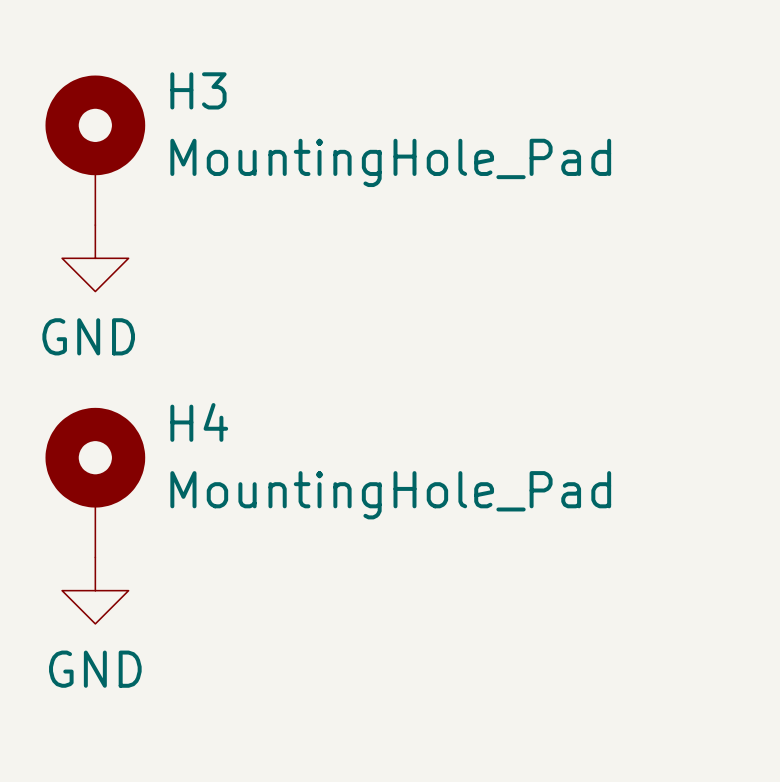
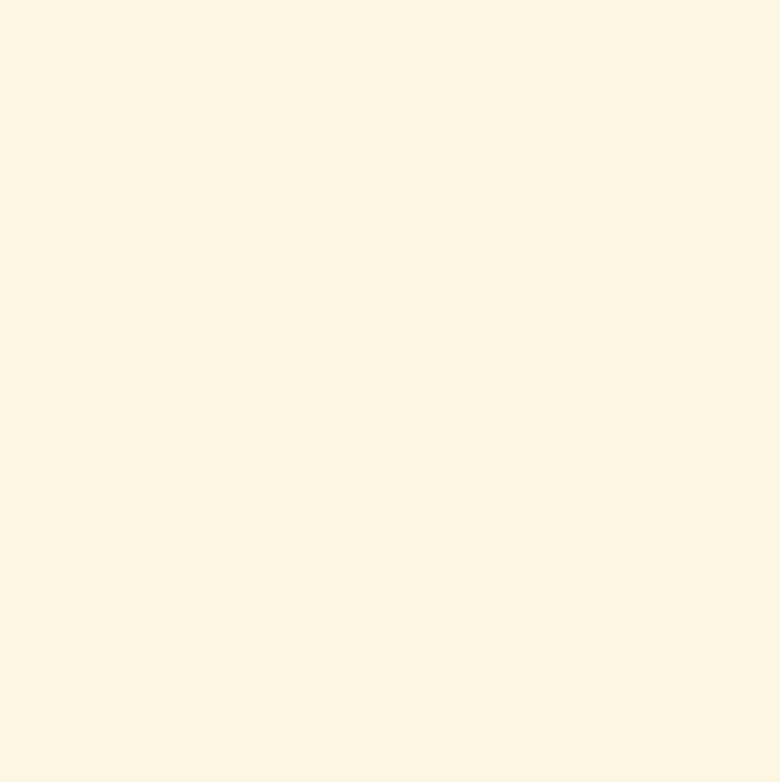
H3: MountingHole_Pad (95, 150) -> none
power symbol: GND (95, 258) -> none
H4: MountingHole_Pad (95, 482) -> none
power symbol: GND (95, 590) -> none

